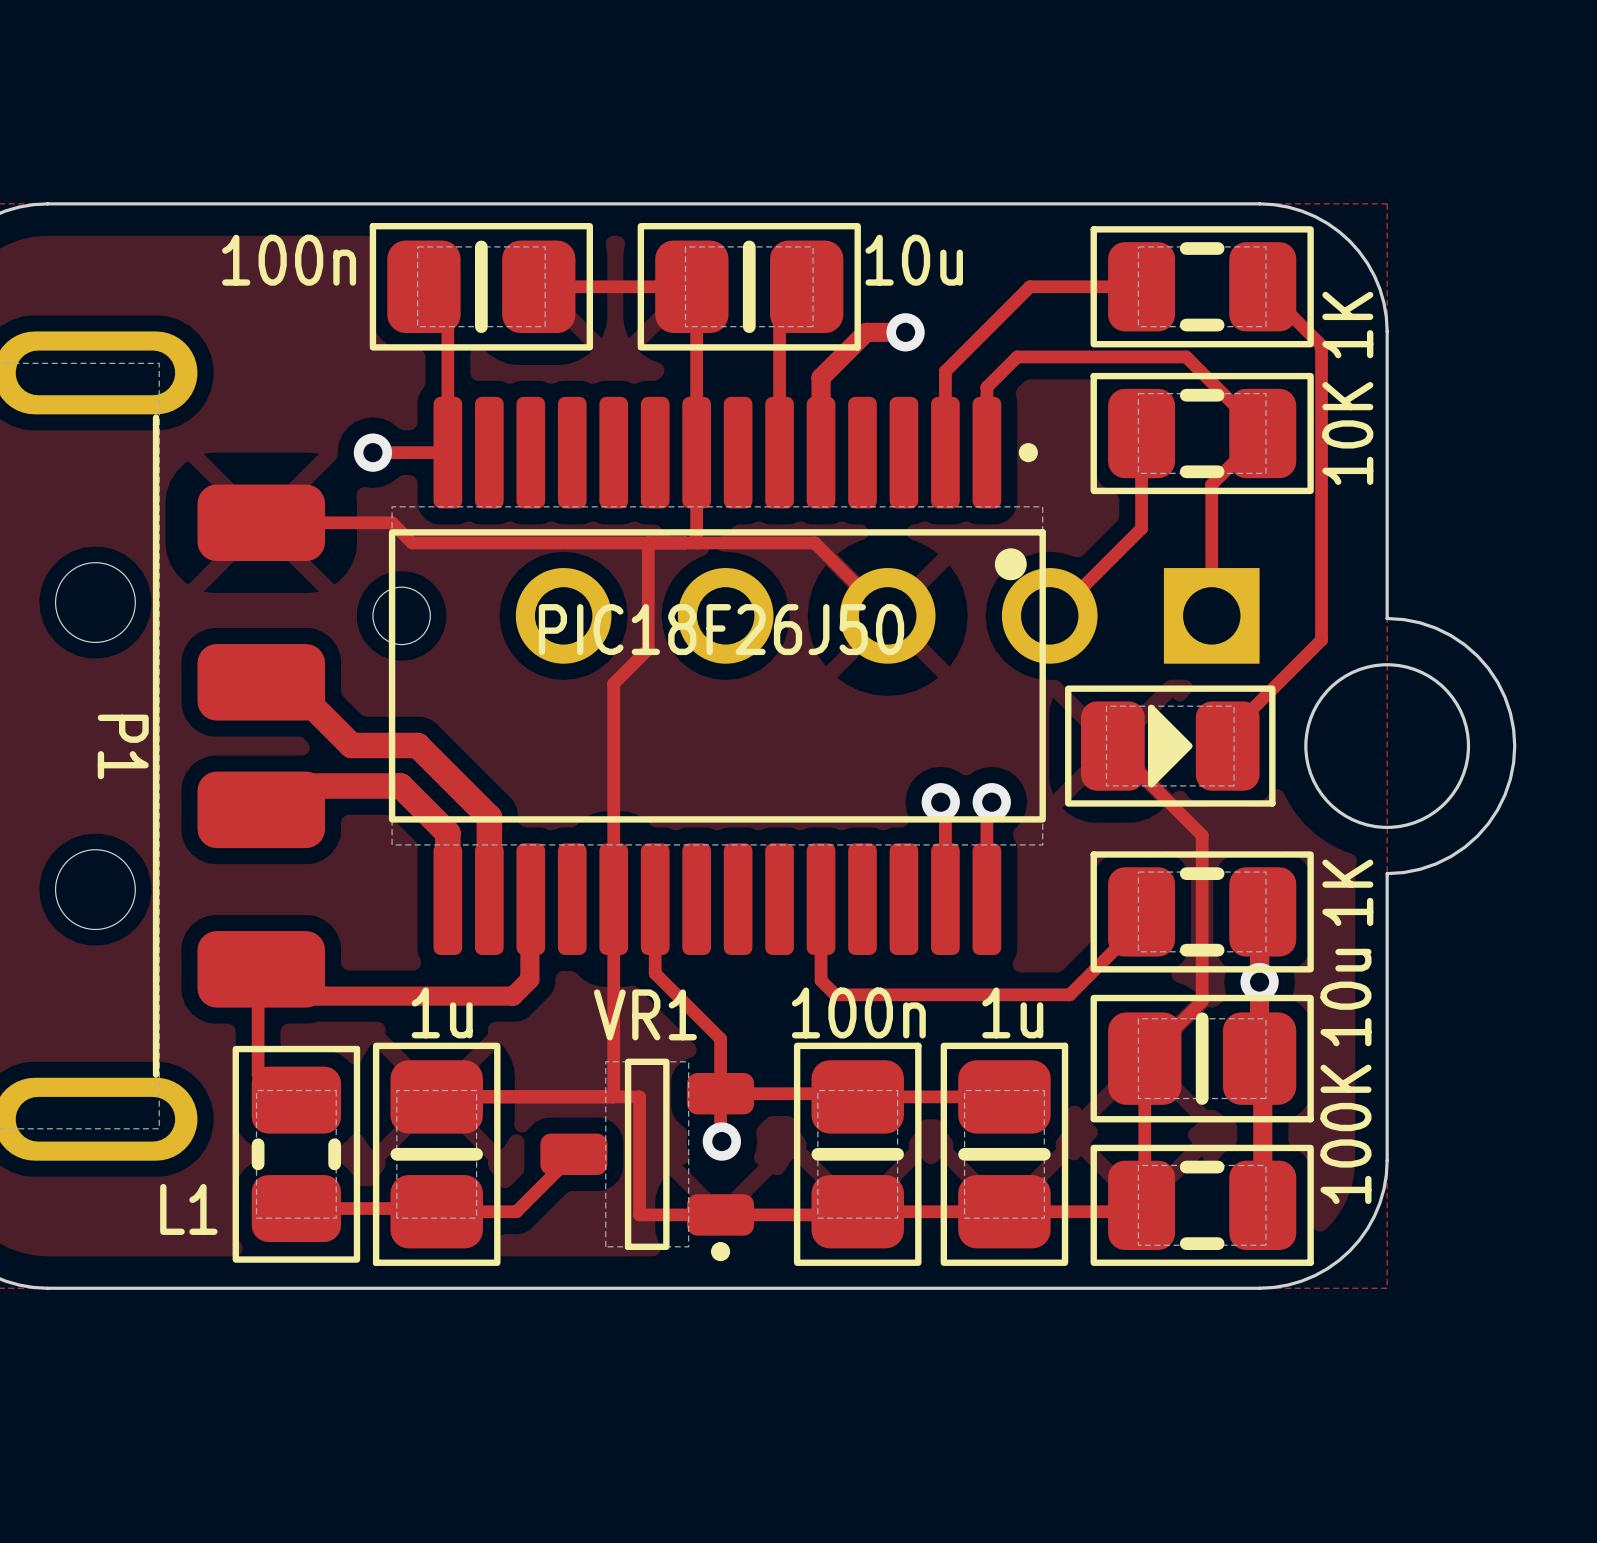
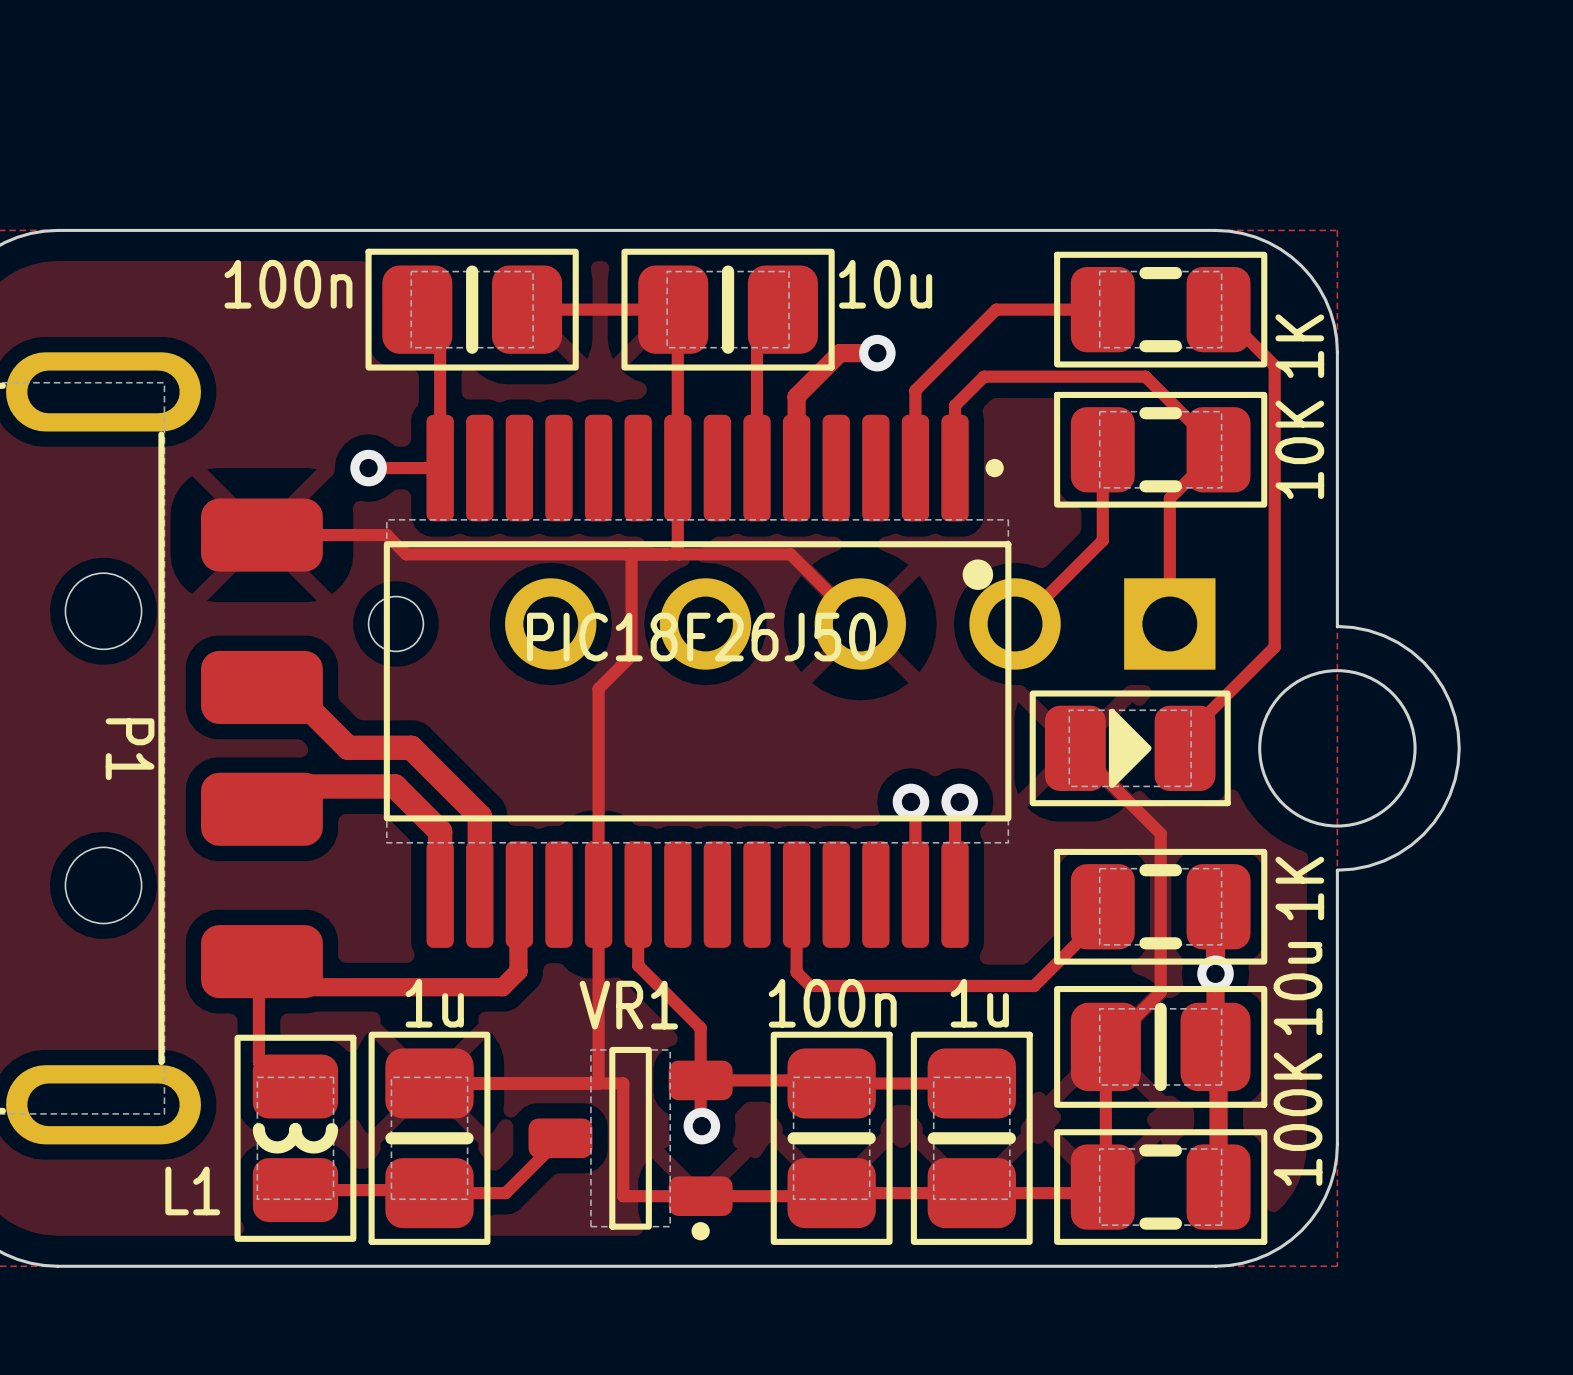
L1 footprint: [232, 1045, 361, 1263] -> [234, 1034, 357, 1242]

